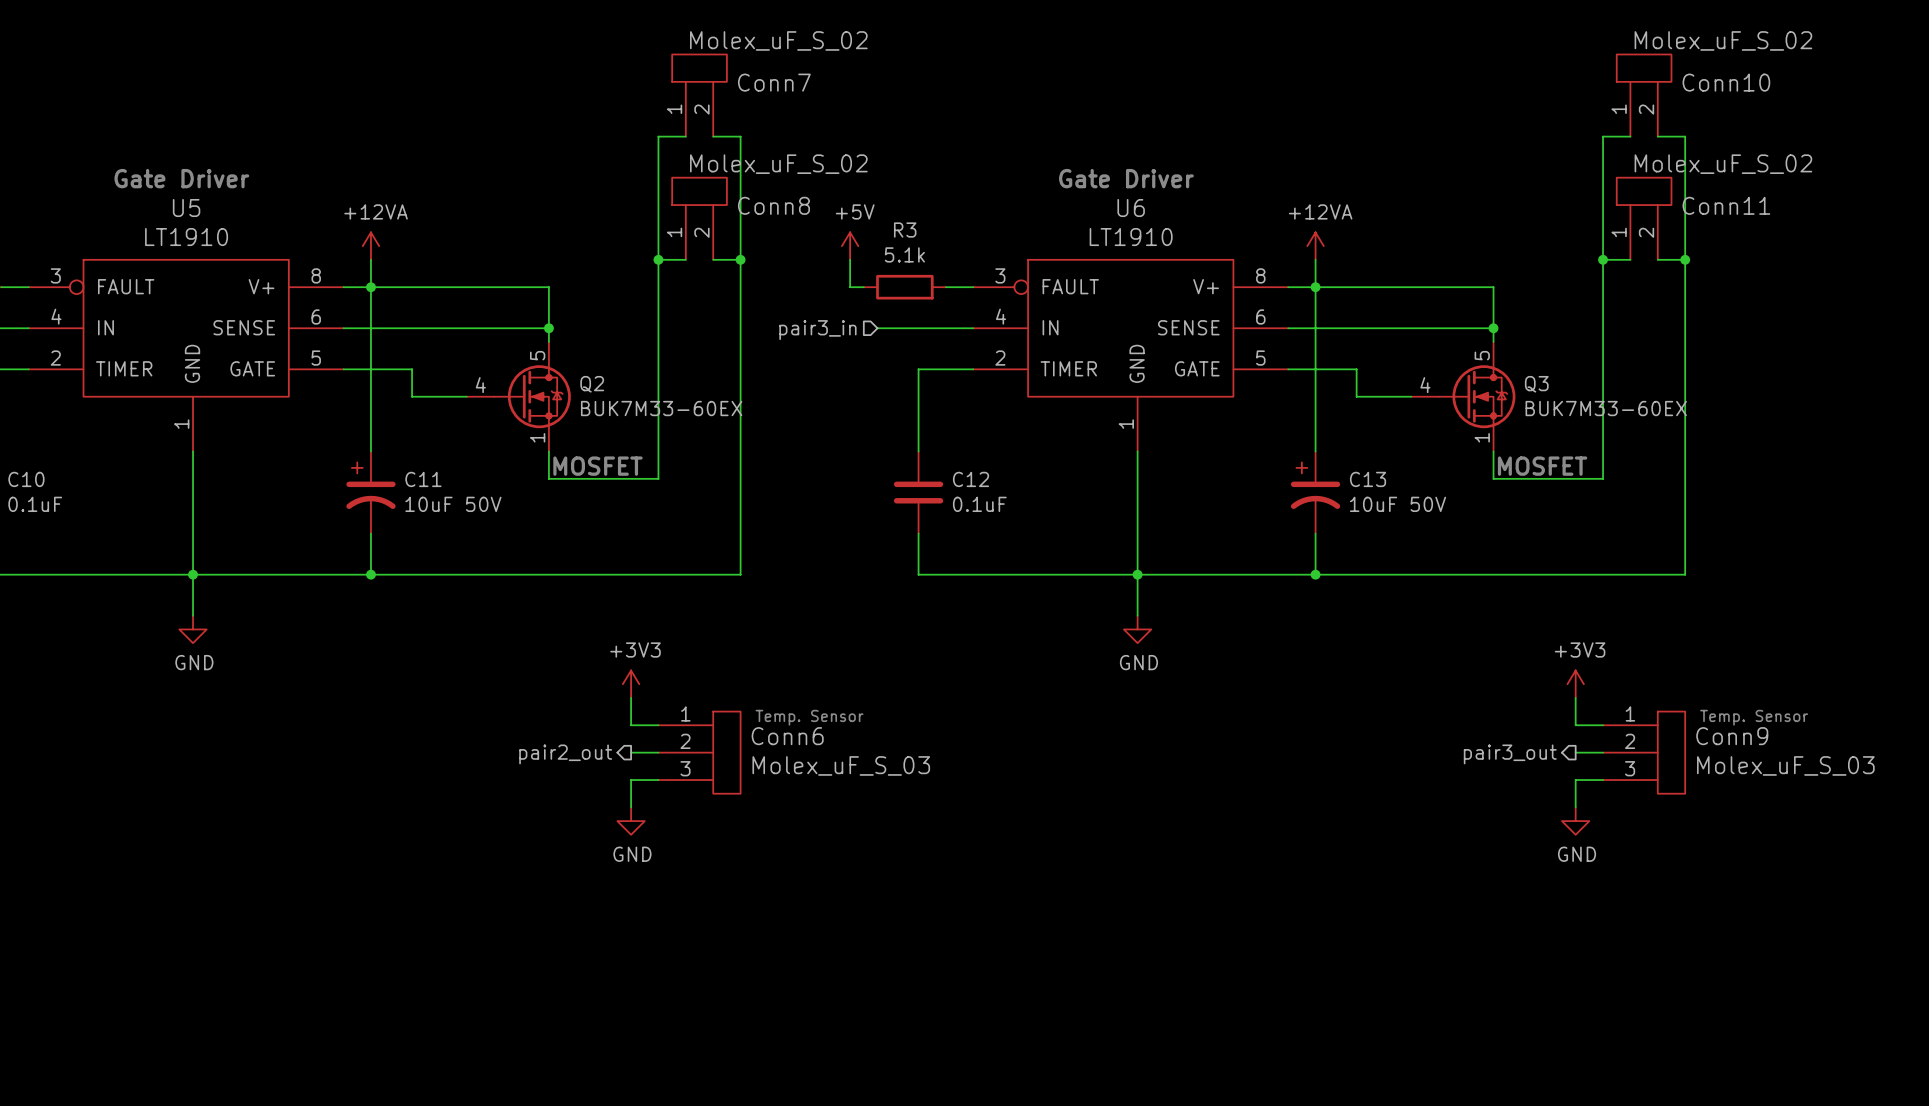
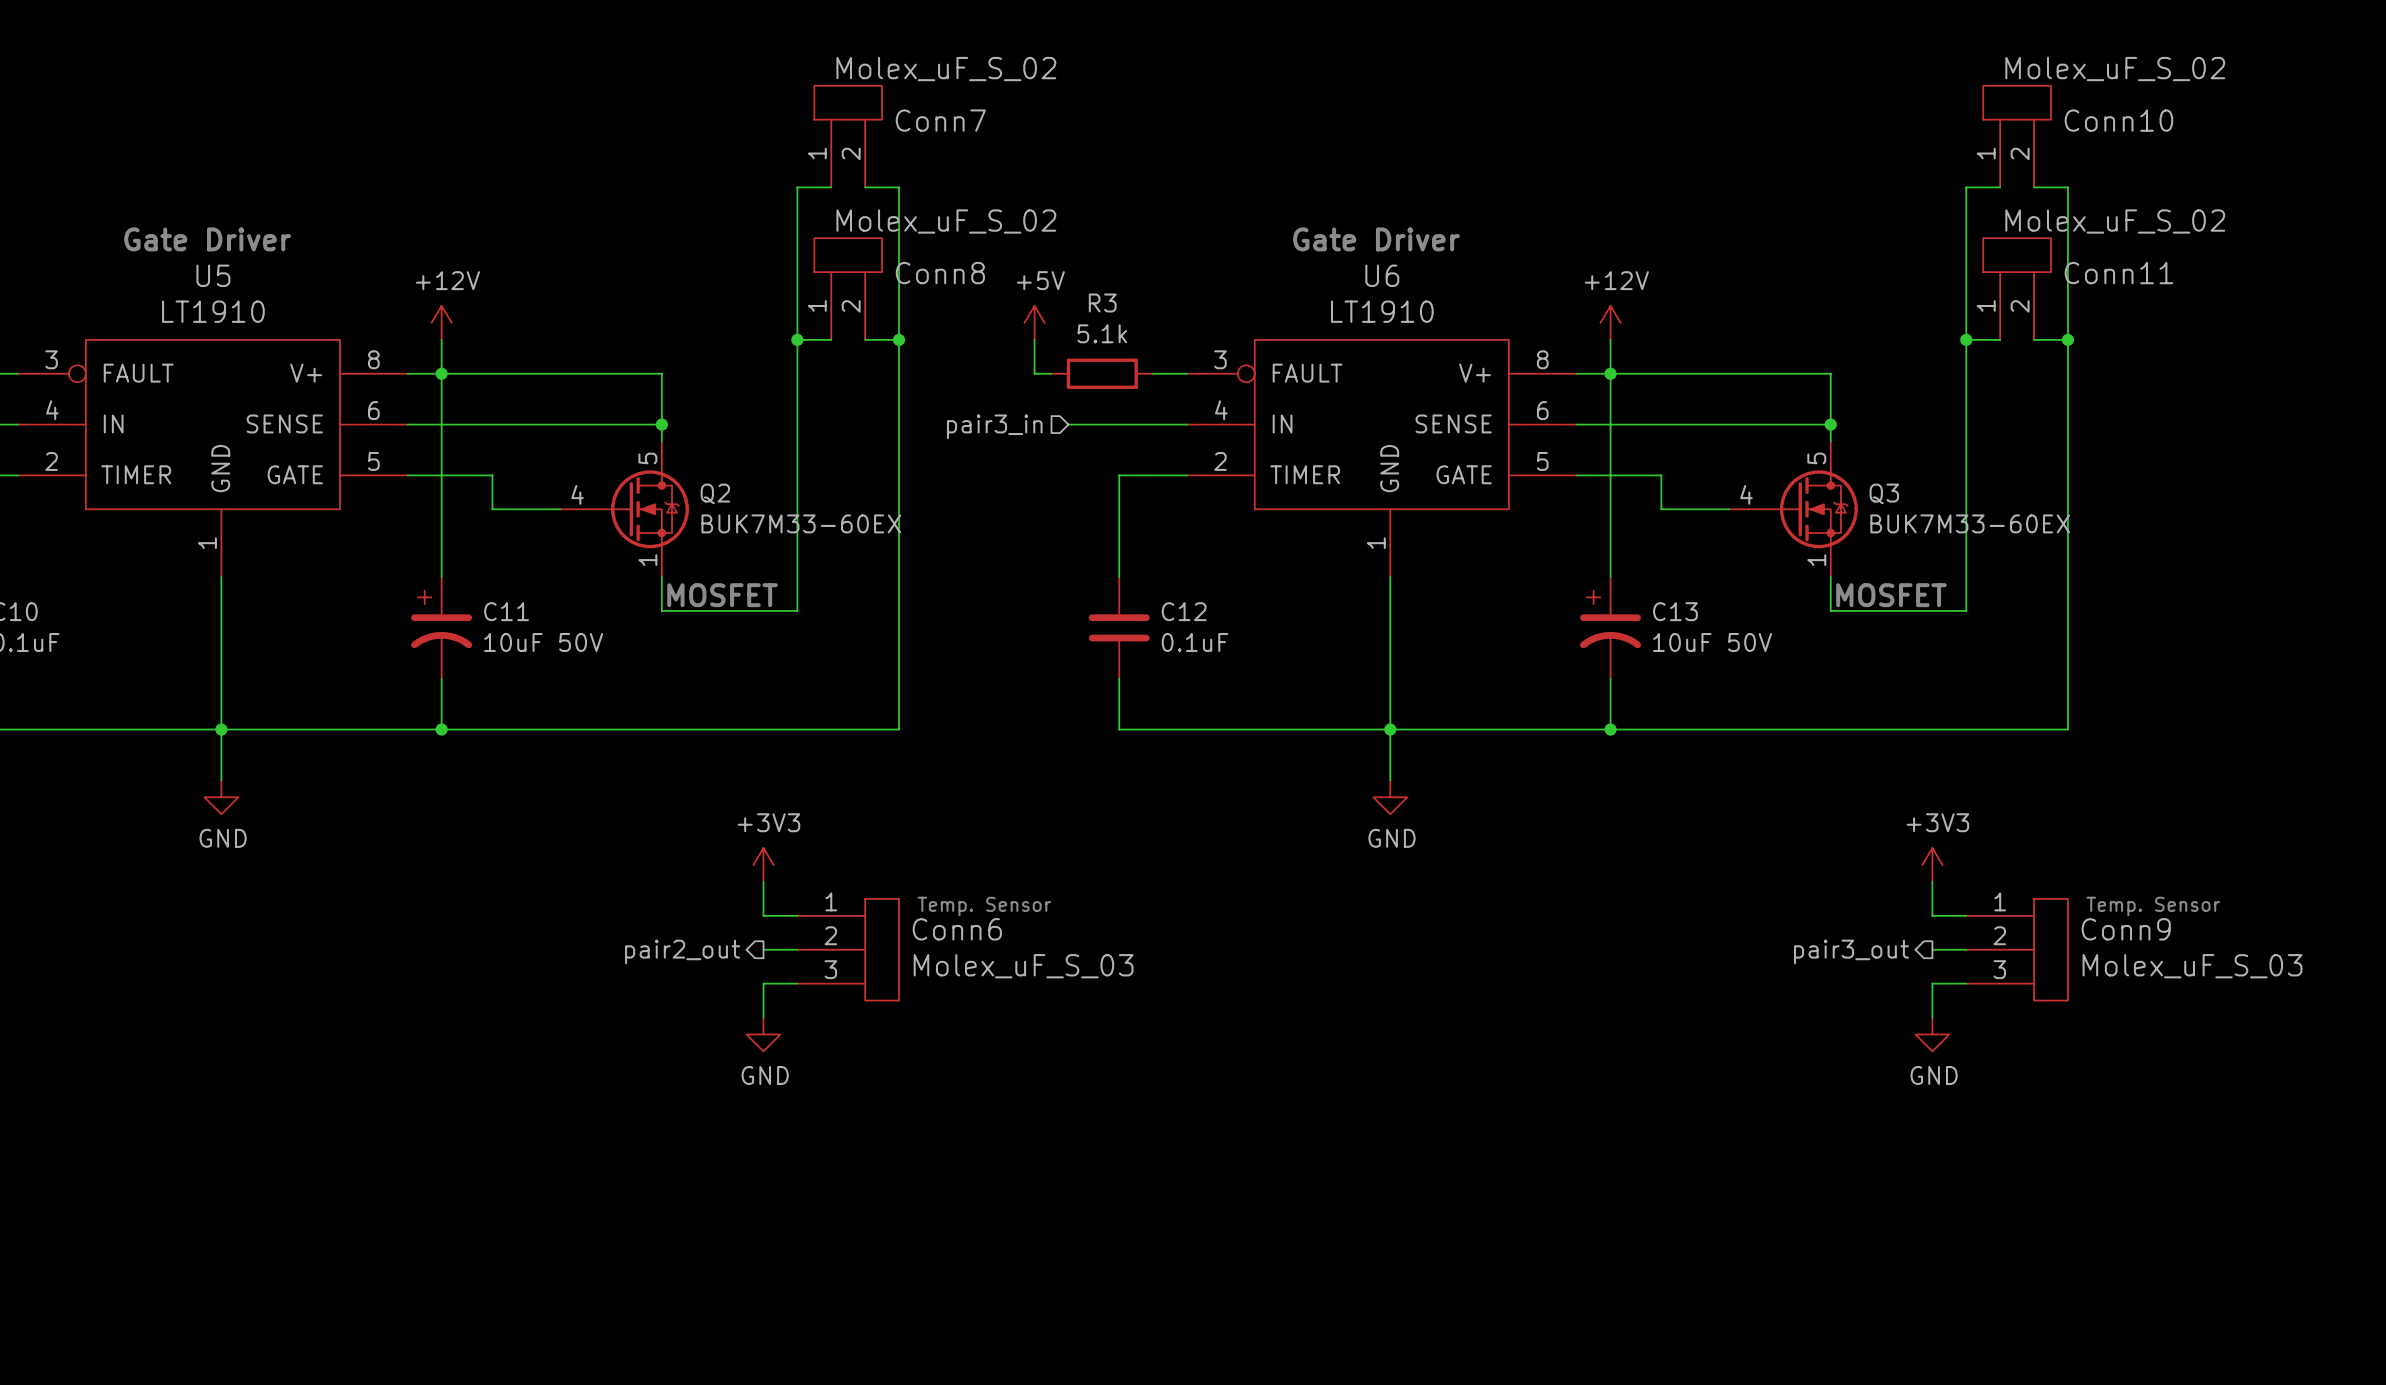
power symbol: +12VA (370, 246) -> +12V (441, 322)
power symbol: +12VA (1315, 246) -> +12V (1610, 322)

